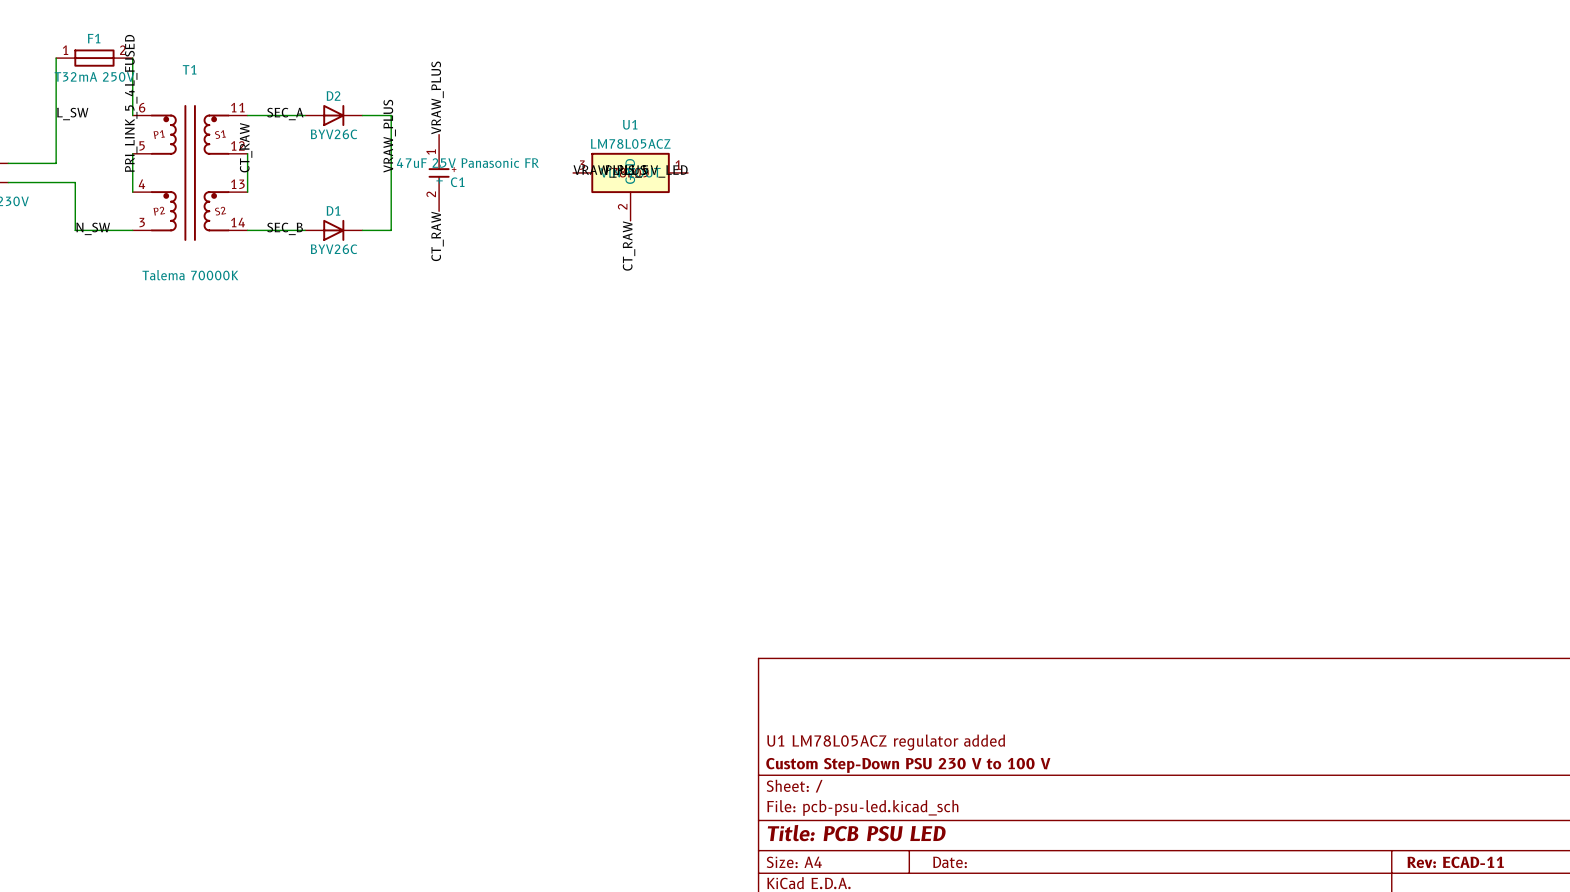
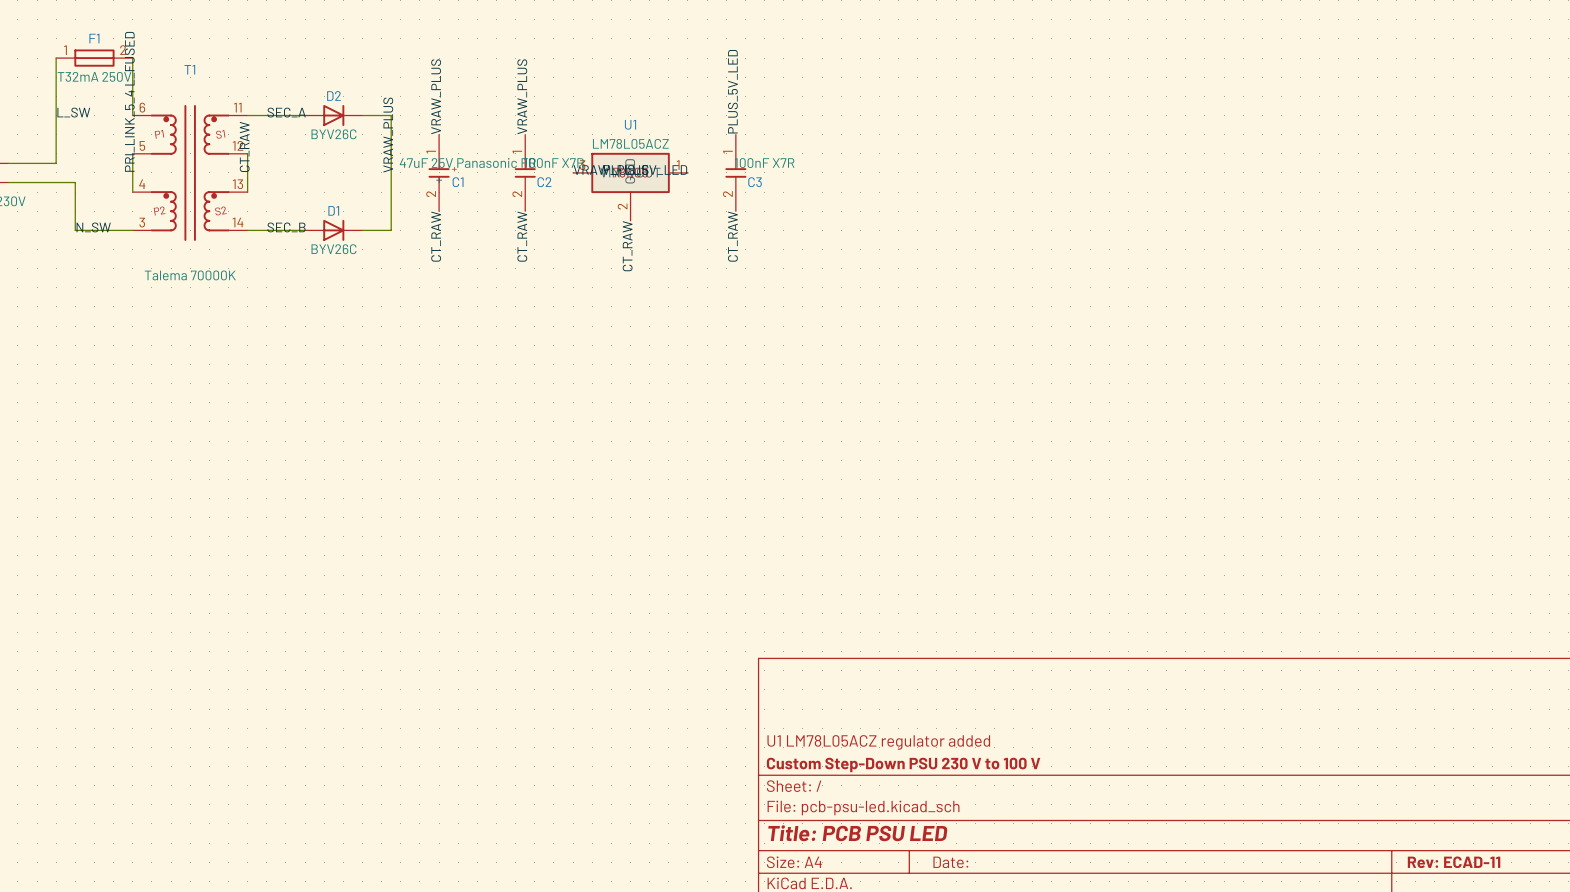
label: none -> PLUS_5V_LED (732, 91)
label: none -> VRAW_PLUS (522, 96)
C2: none -> 100nF X7R (525, 172)
C3: none -> 100nF X7R (735, 172)
label: none -> CT_RAW (522, 236)
label: none -> CT_RAW (732, 236)

